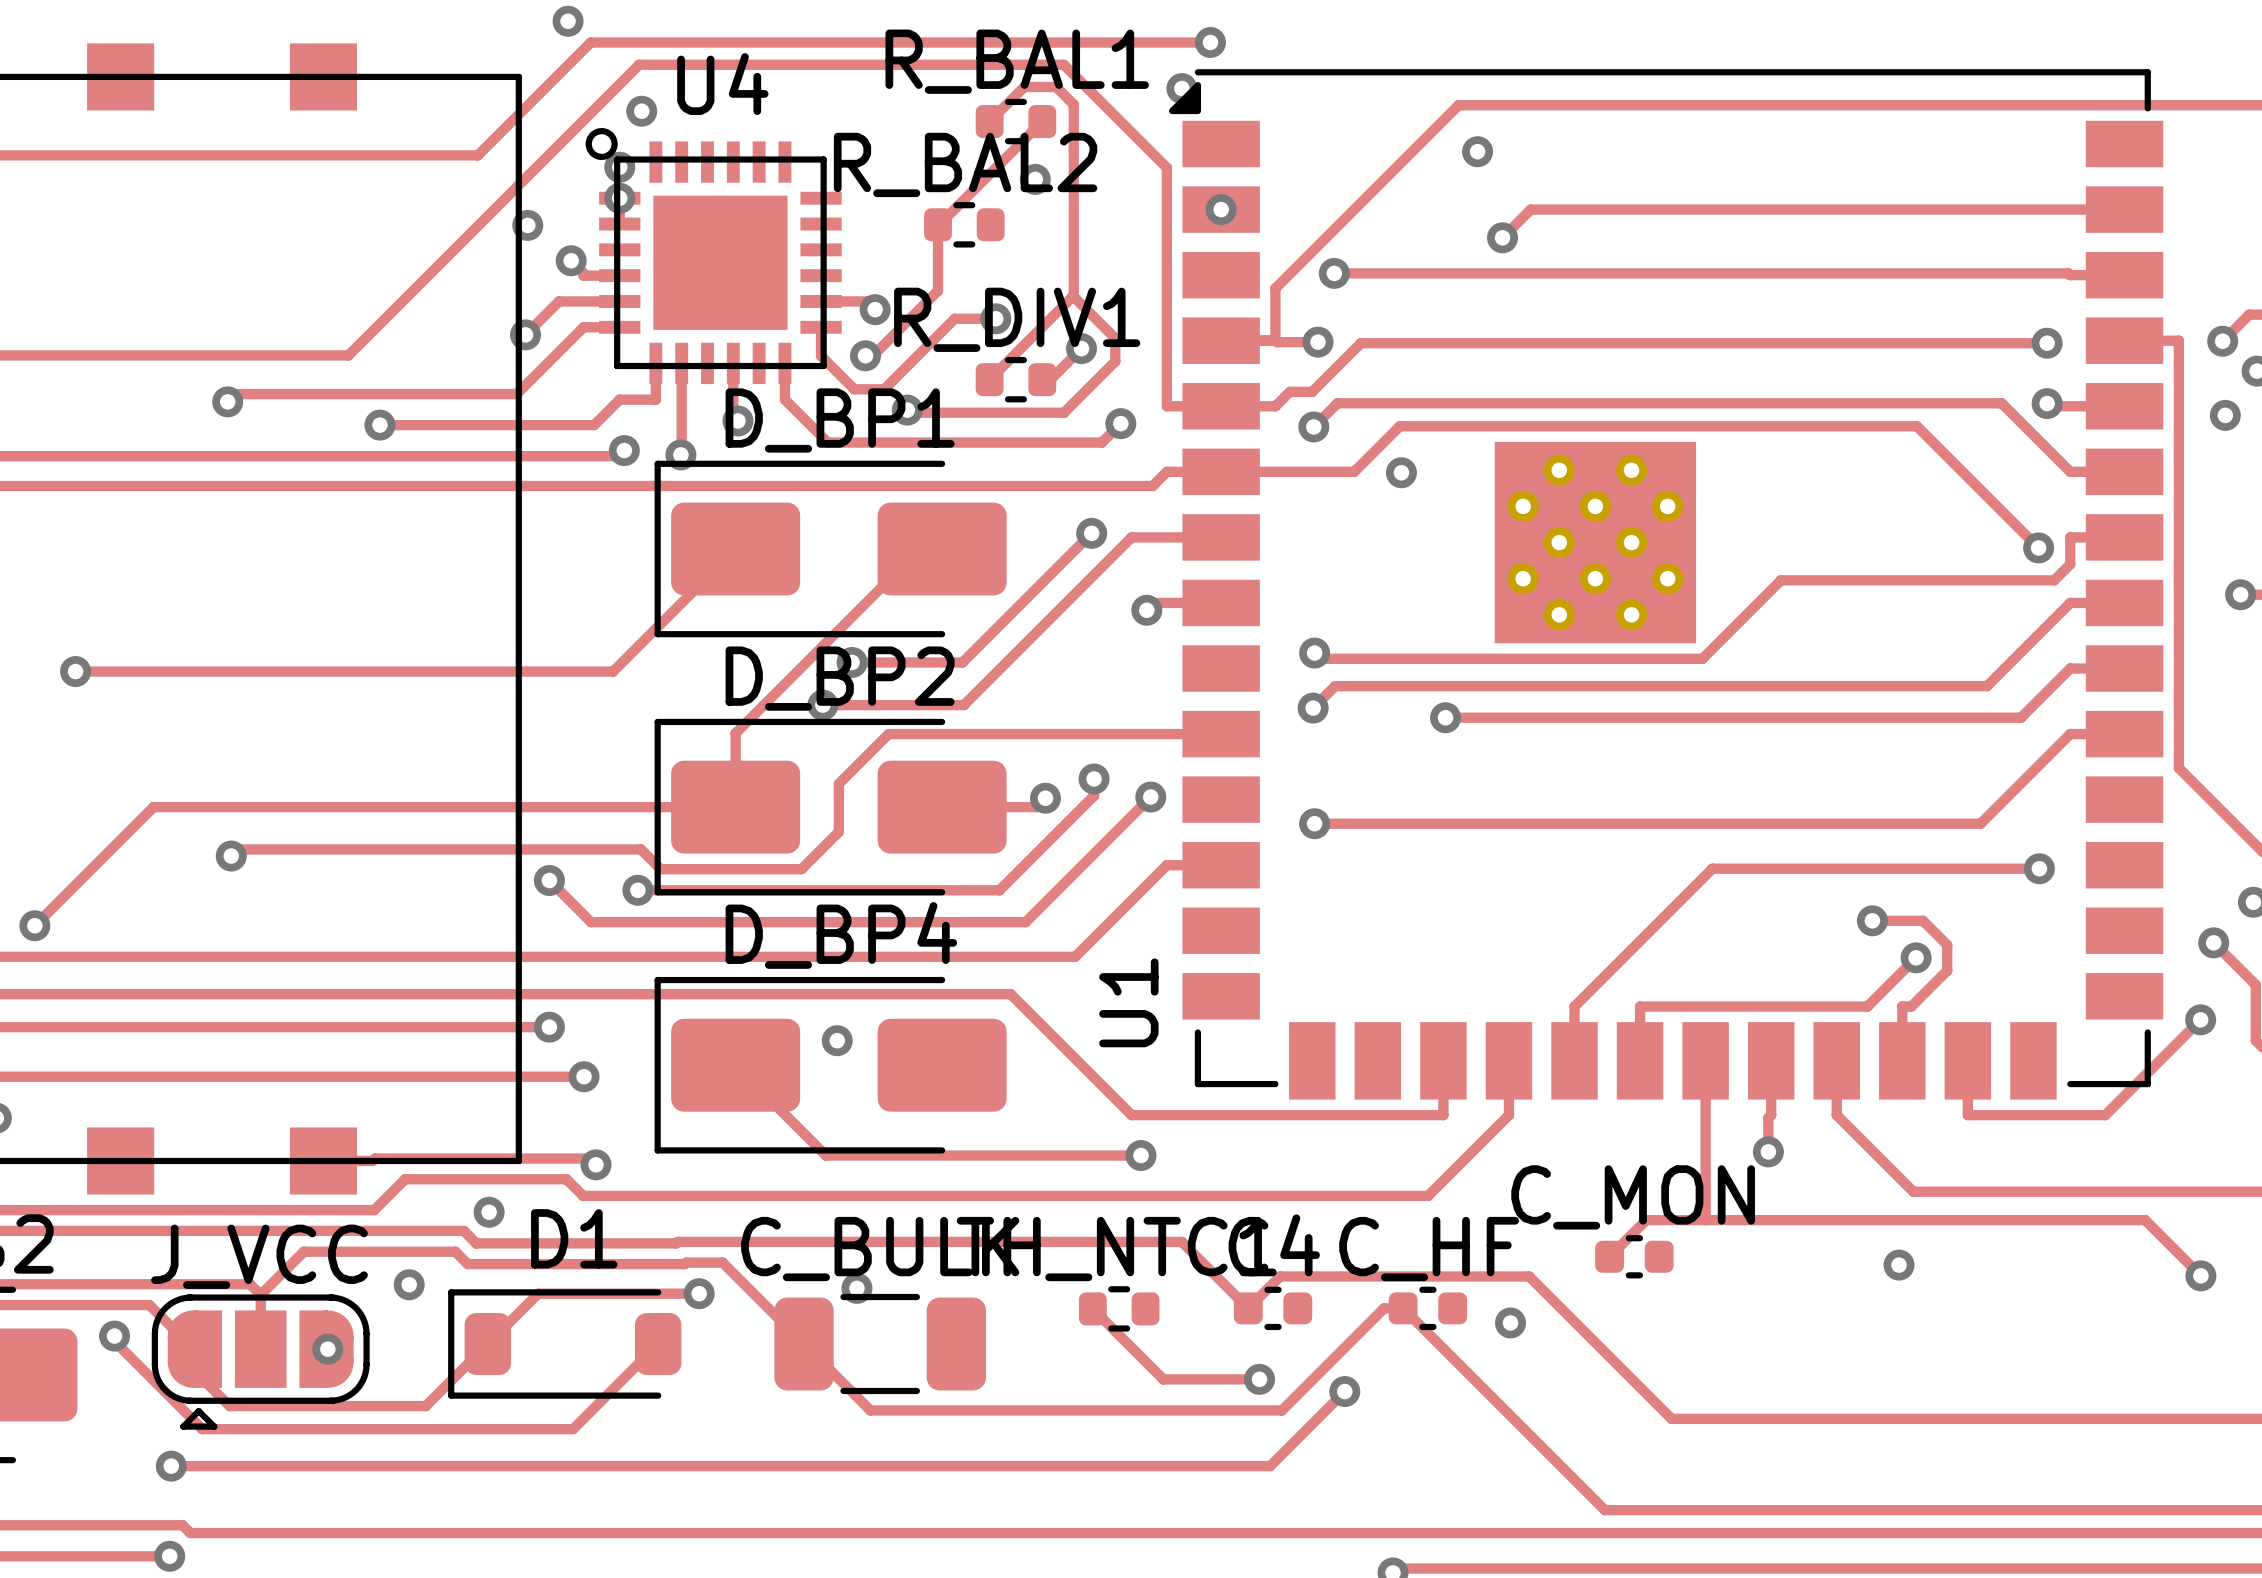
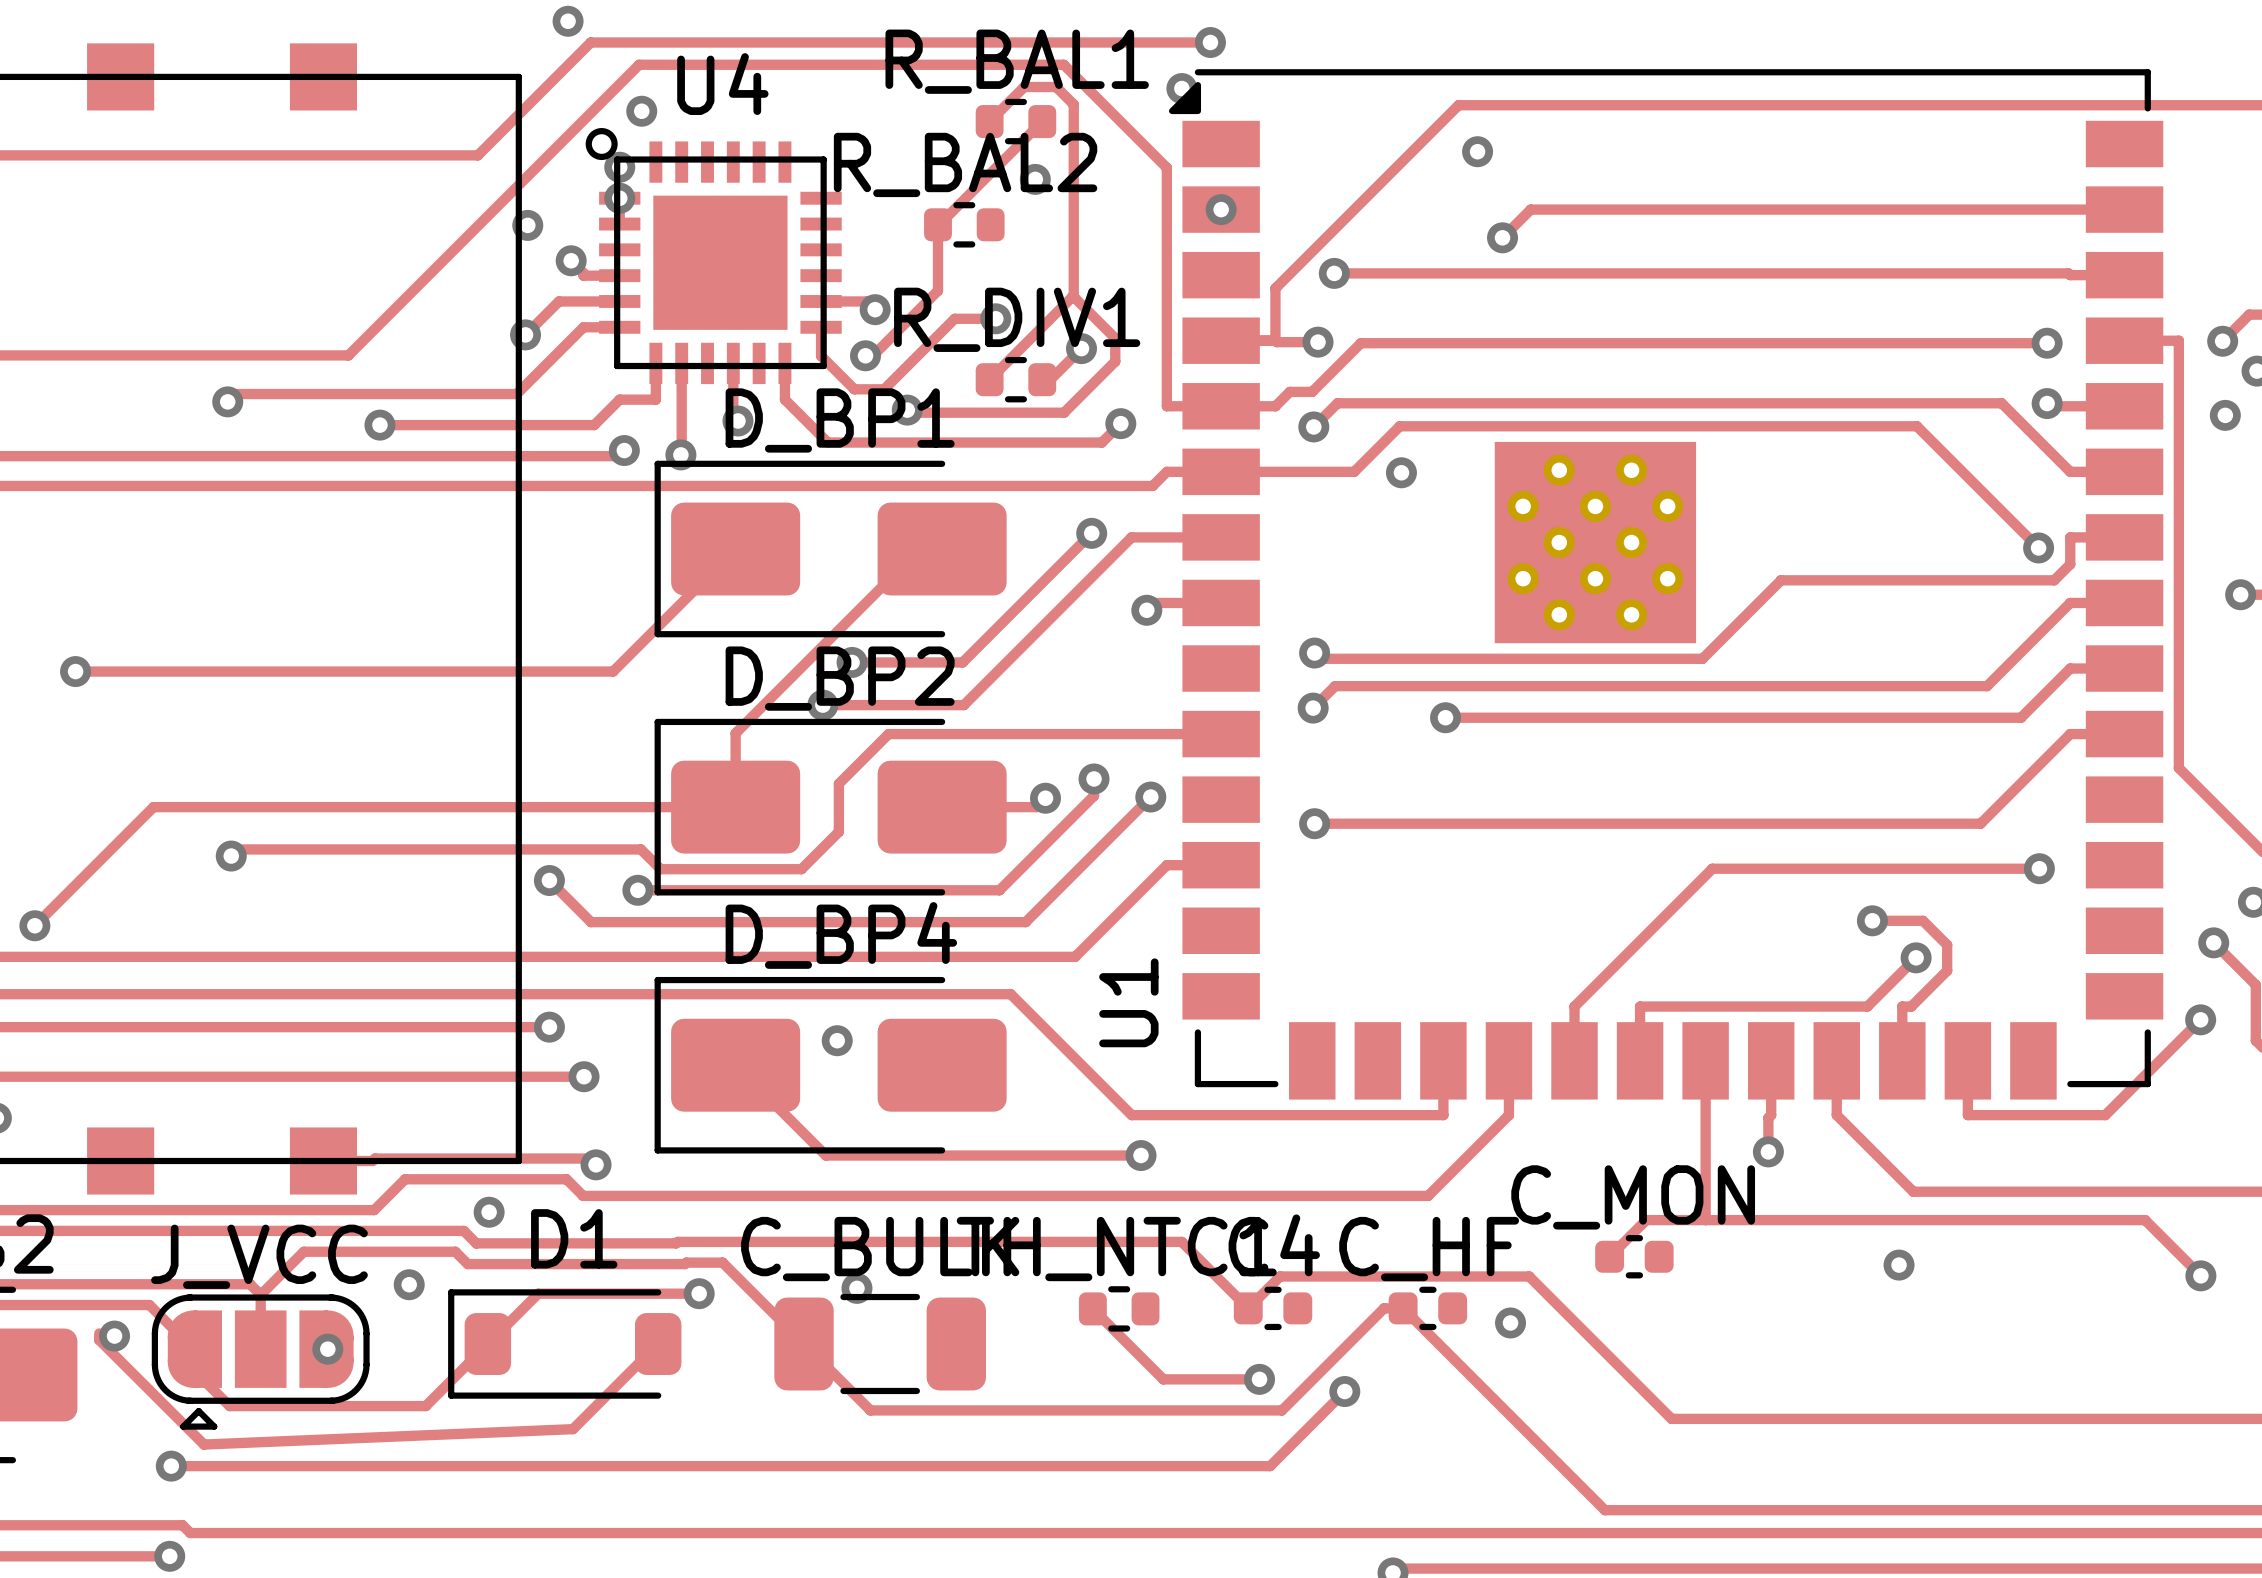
track: (114, 1336) (114, 1341) (202, 1429) (573, 1429) -> (99, 1333) (99, 1339) (204, 1444) (573, 1429)

